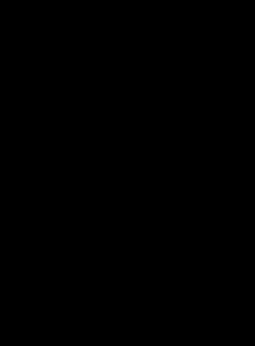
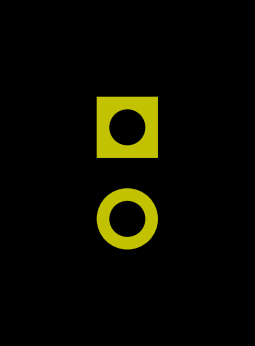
part: none -> (127, 173)

